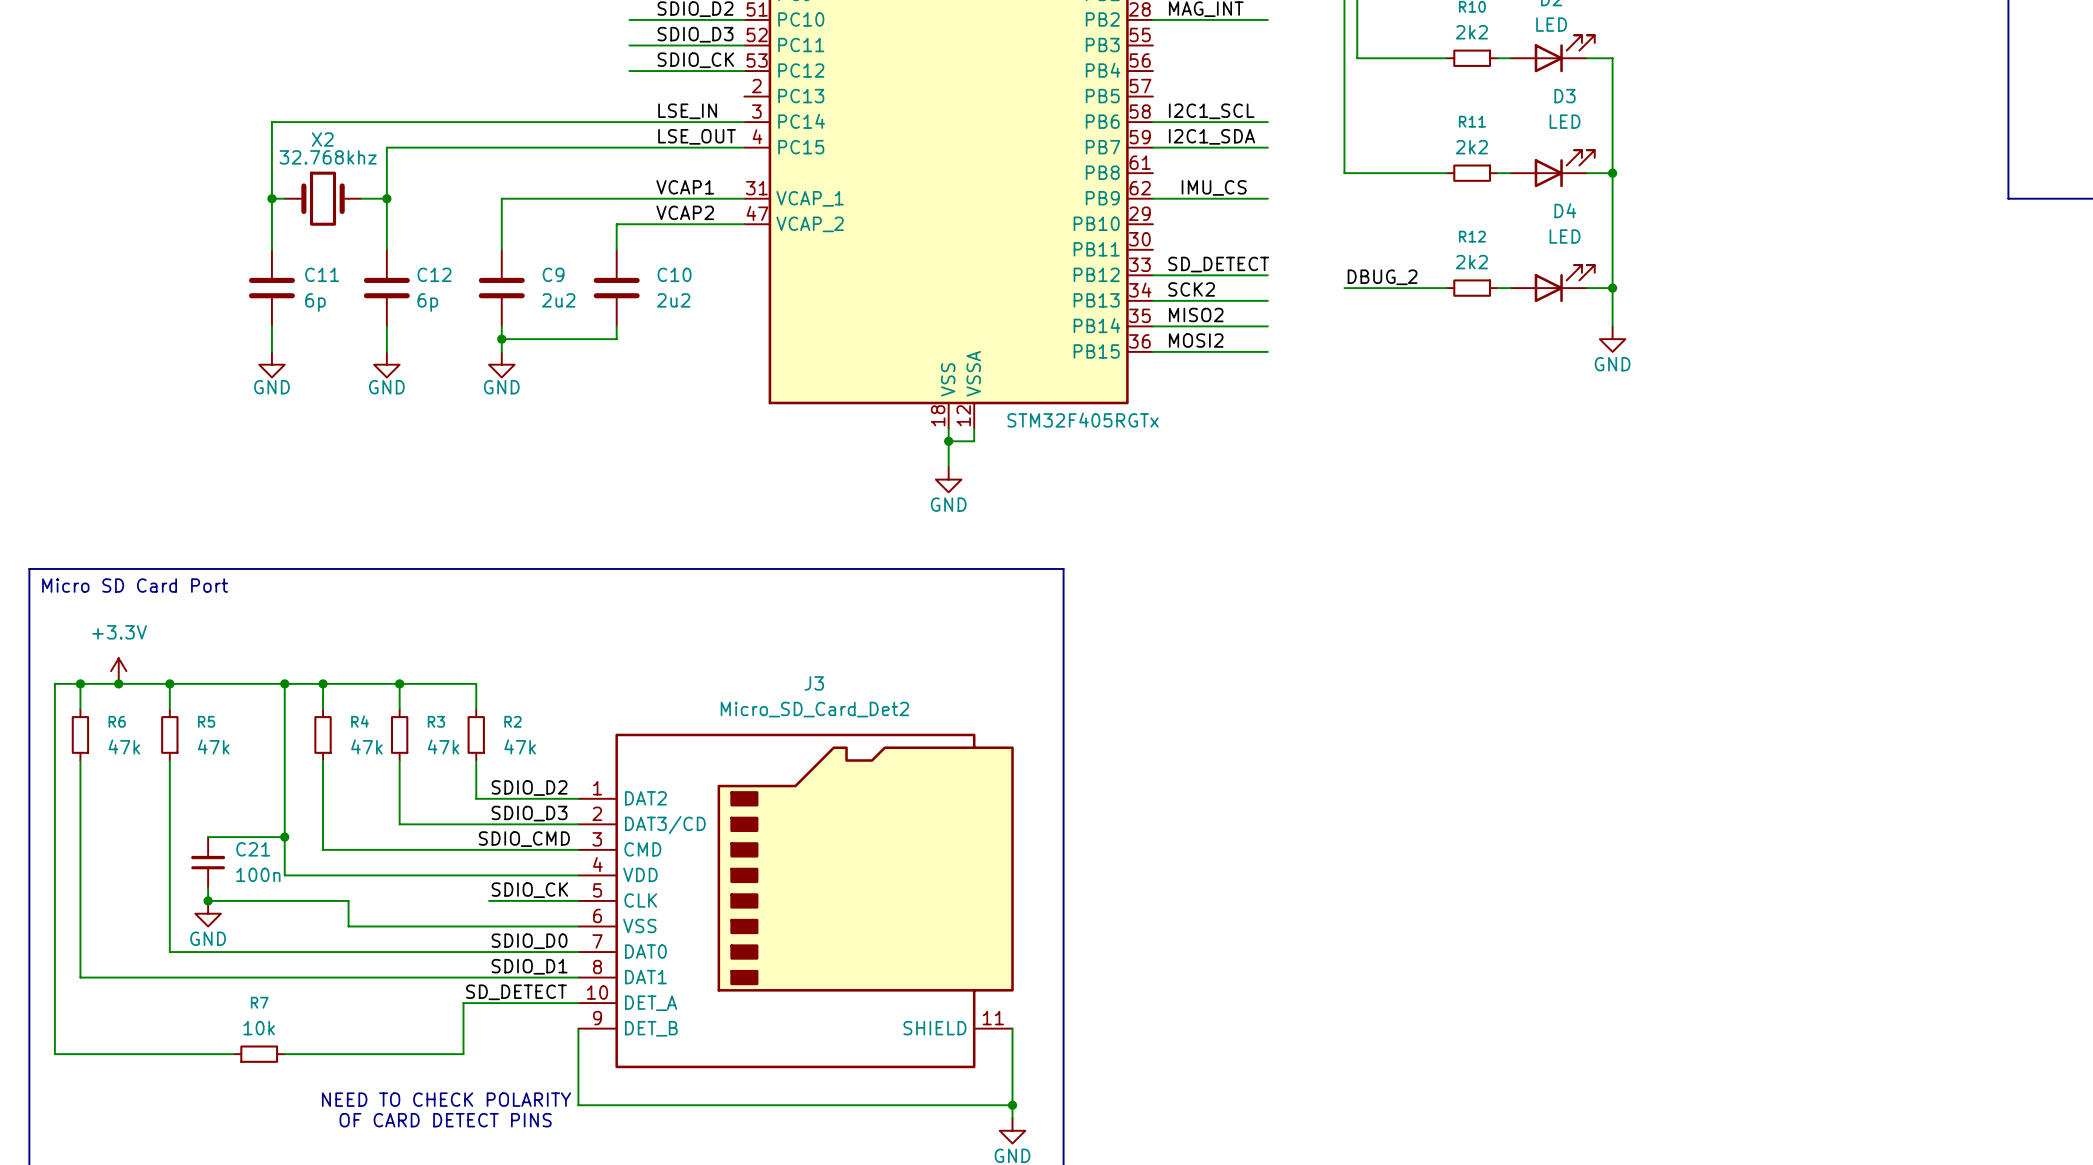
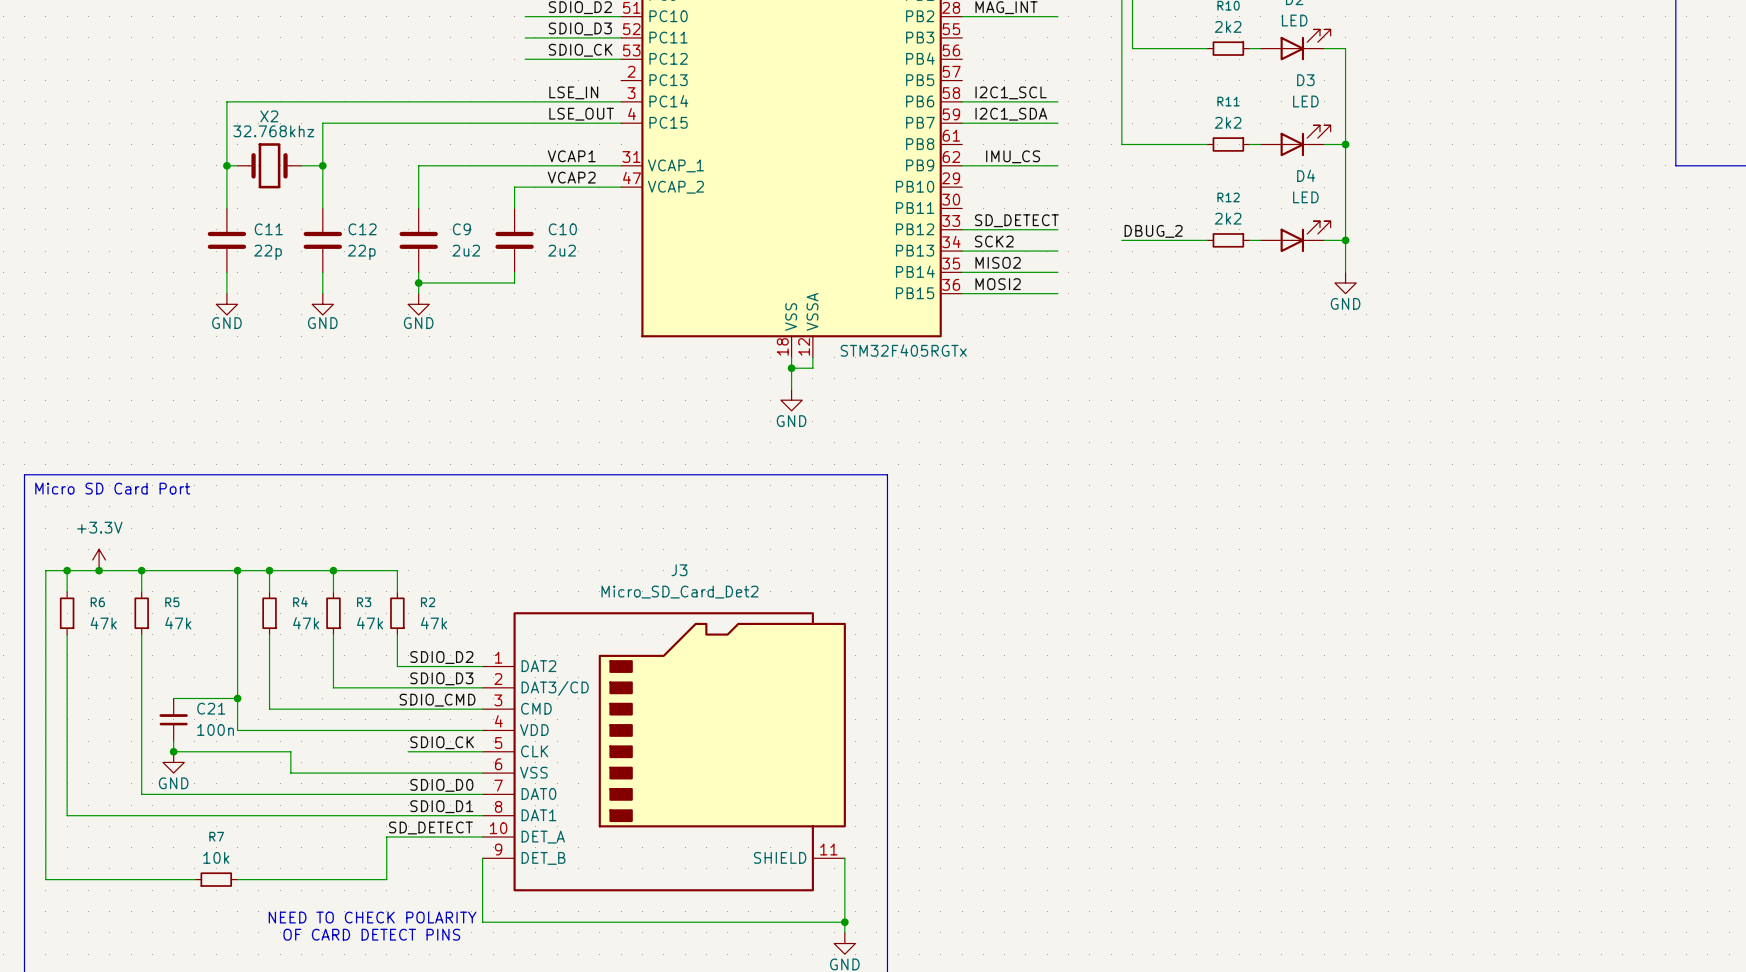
C11 value: 6p (315, 302) -> 22p (268, 252)
C12 value: 6p (427, 302) -> 22p (361, 252)

